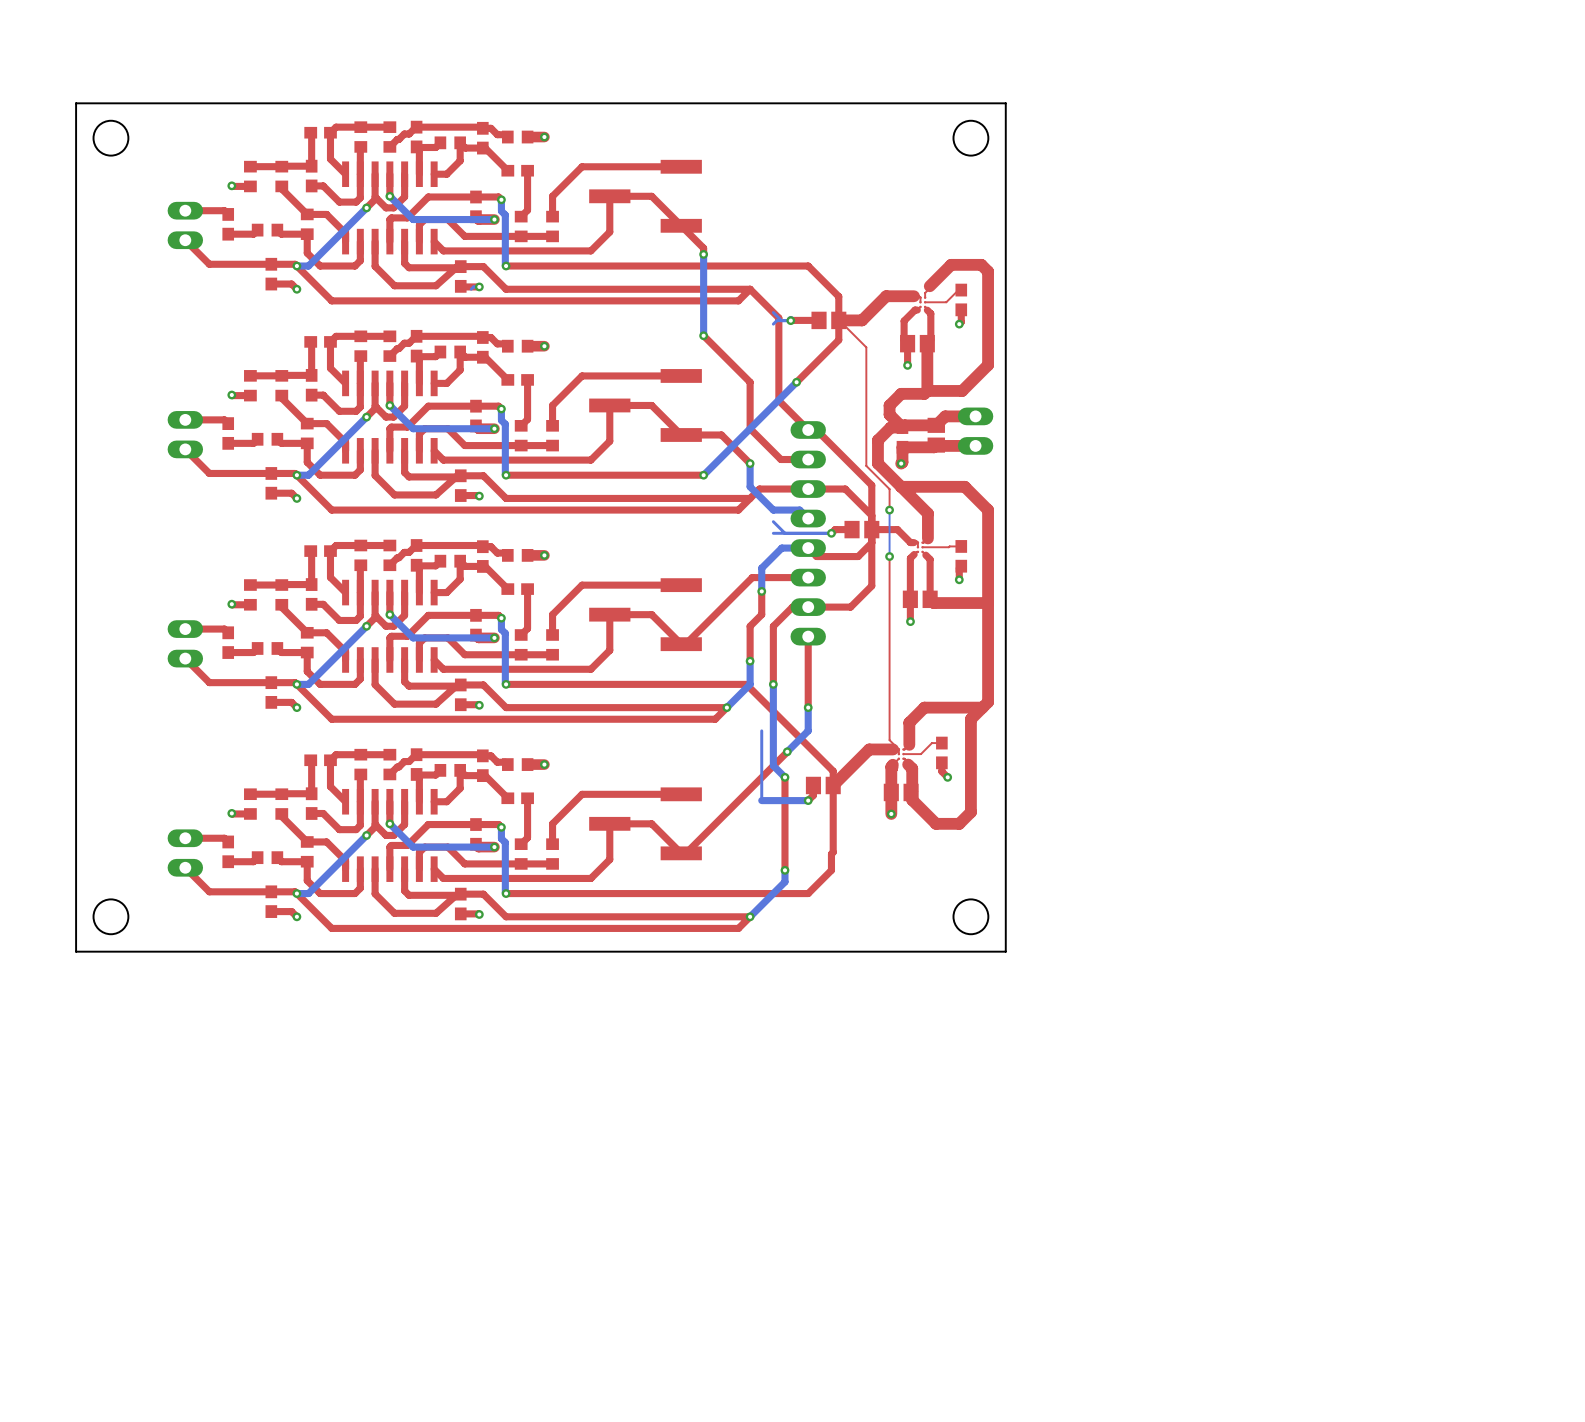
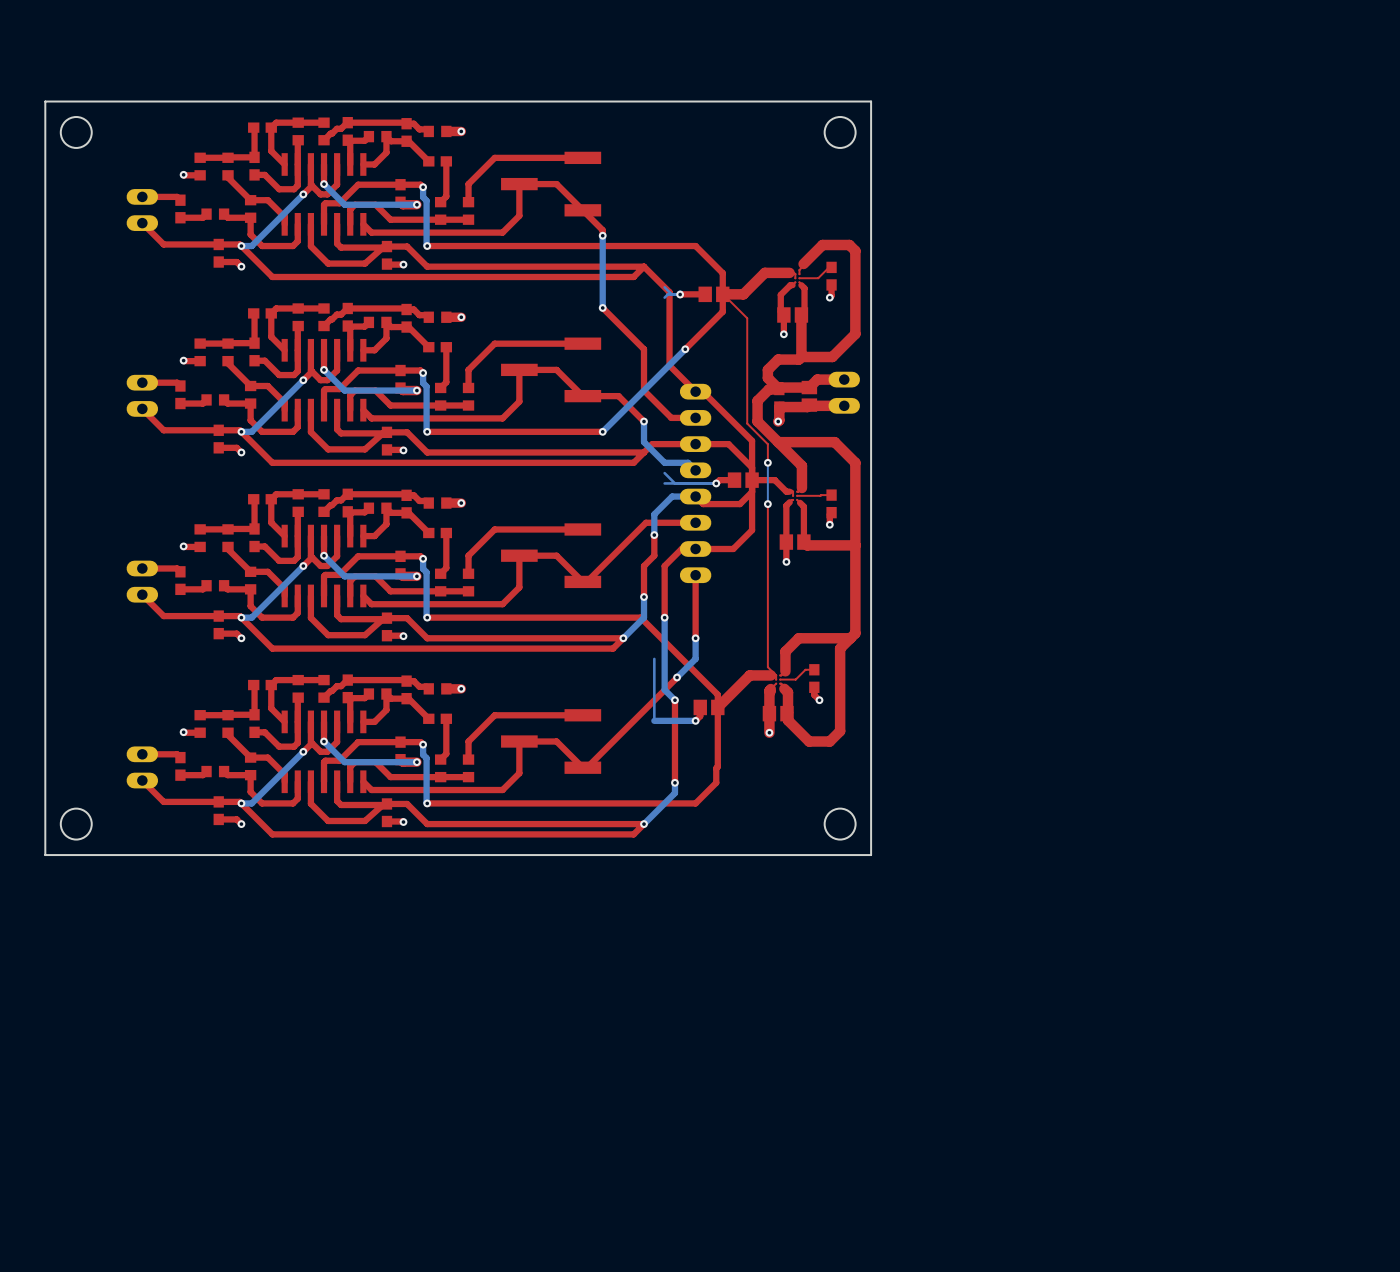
bottom track: (479, 286) (473, 286) (471, 289) -> none

